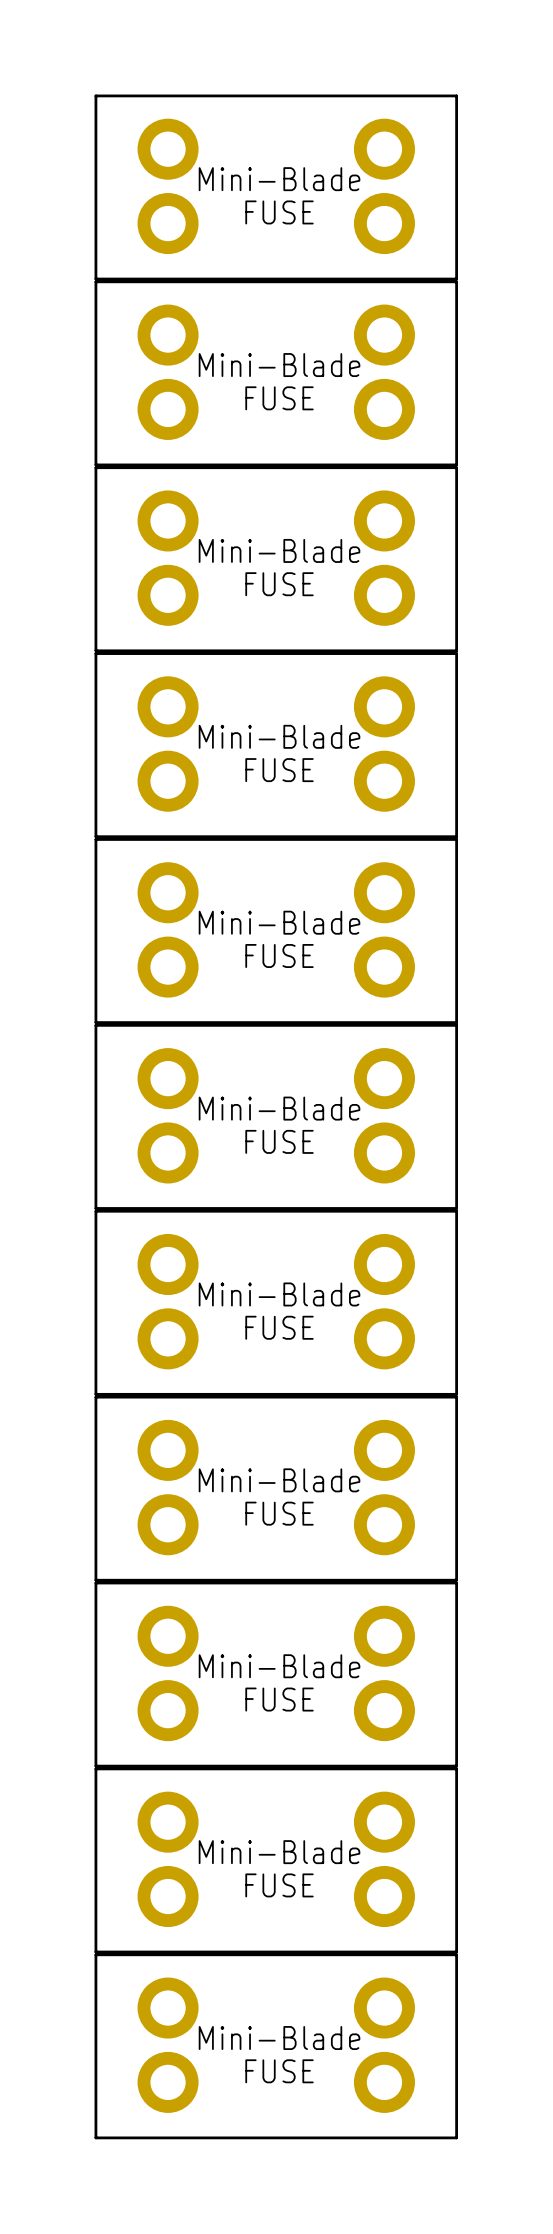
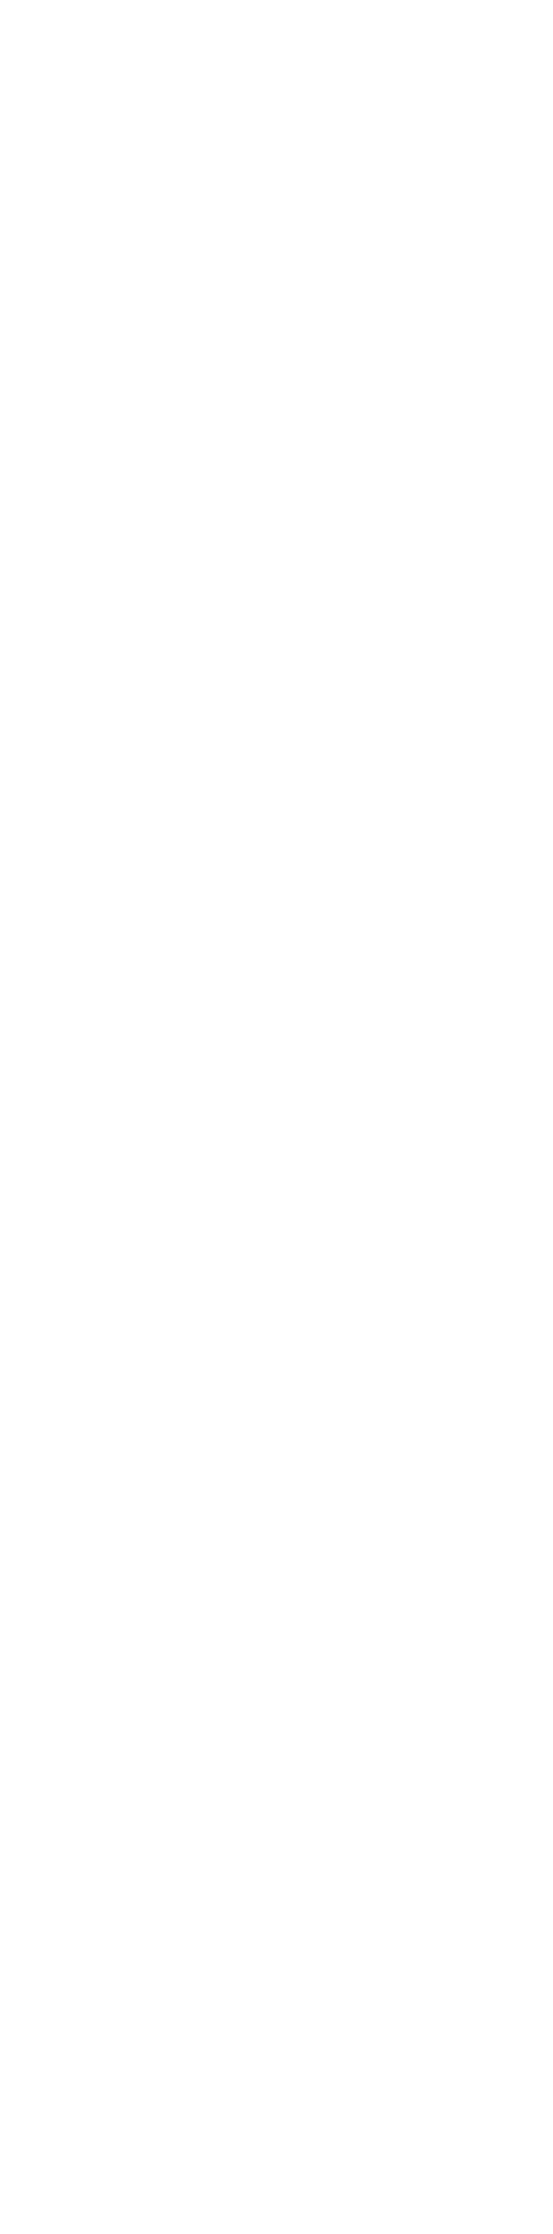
part: (276, 187) -> none
part: (276, 373) -> none
part: (276, 559) -> none
part: (276, 745) -> none
part: (276, 931) -> none
part: (276, 1116) -> none
part: (276, 1302) -> none
part: (276, 1488) -> none
part: (276, 1674) -> none
part: (276, 1860) -> none
part: (276, 2046) -> none

